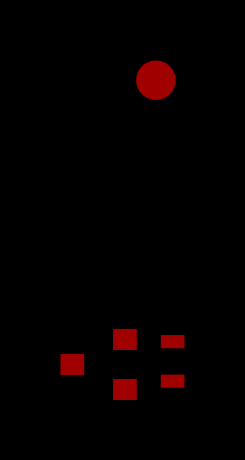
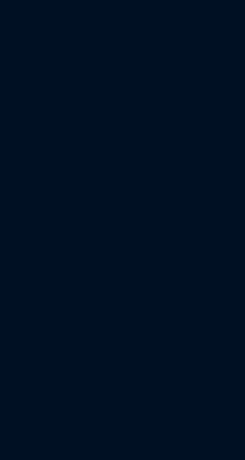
part: (155, 80) -> none
part: (172, 361) -> none
part: (98, 364) -> none

